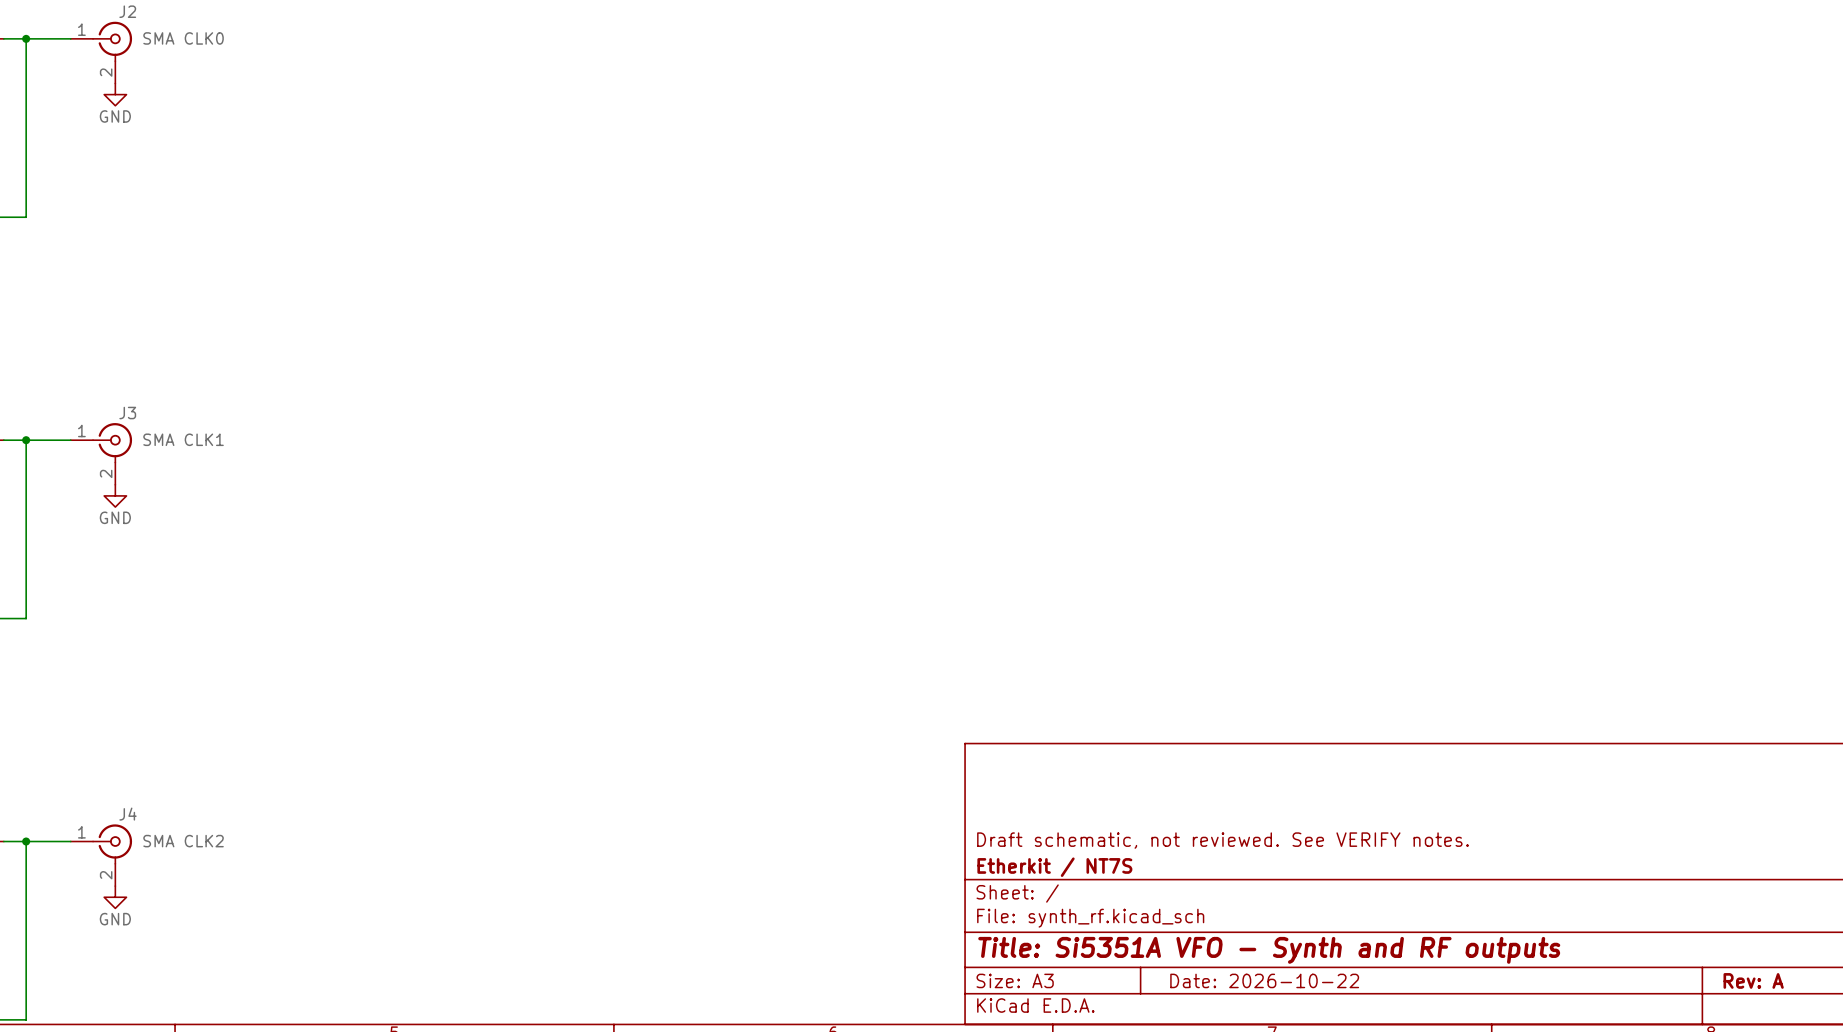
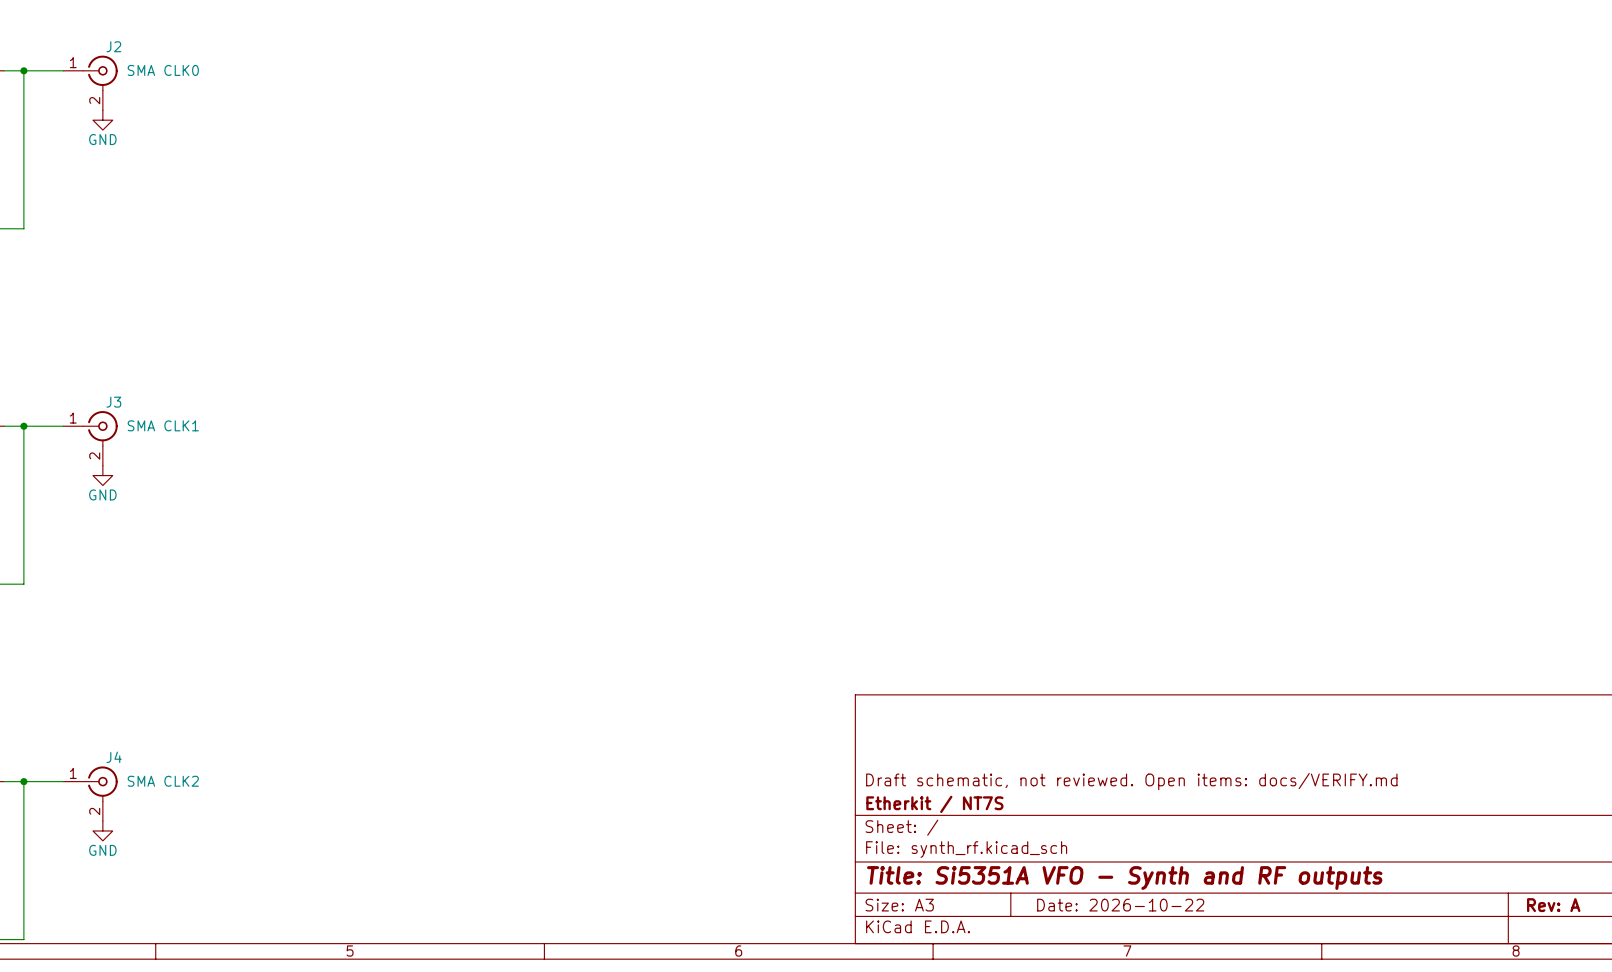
title block: Draft schematic, not reviewed. See VERIFY notes. (1222, 840) -> Draft schematic, not reviewed. Open items: docs/VERIFY.md (1131, 781)

